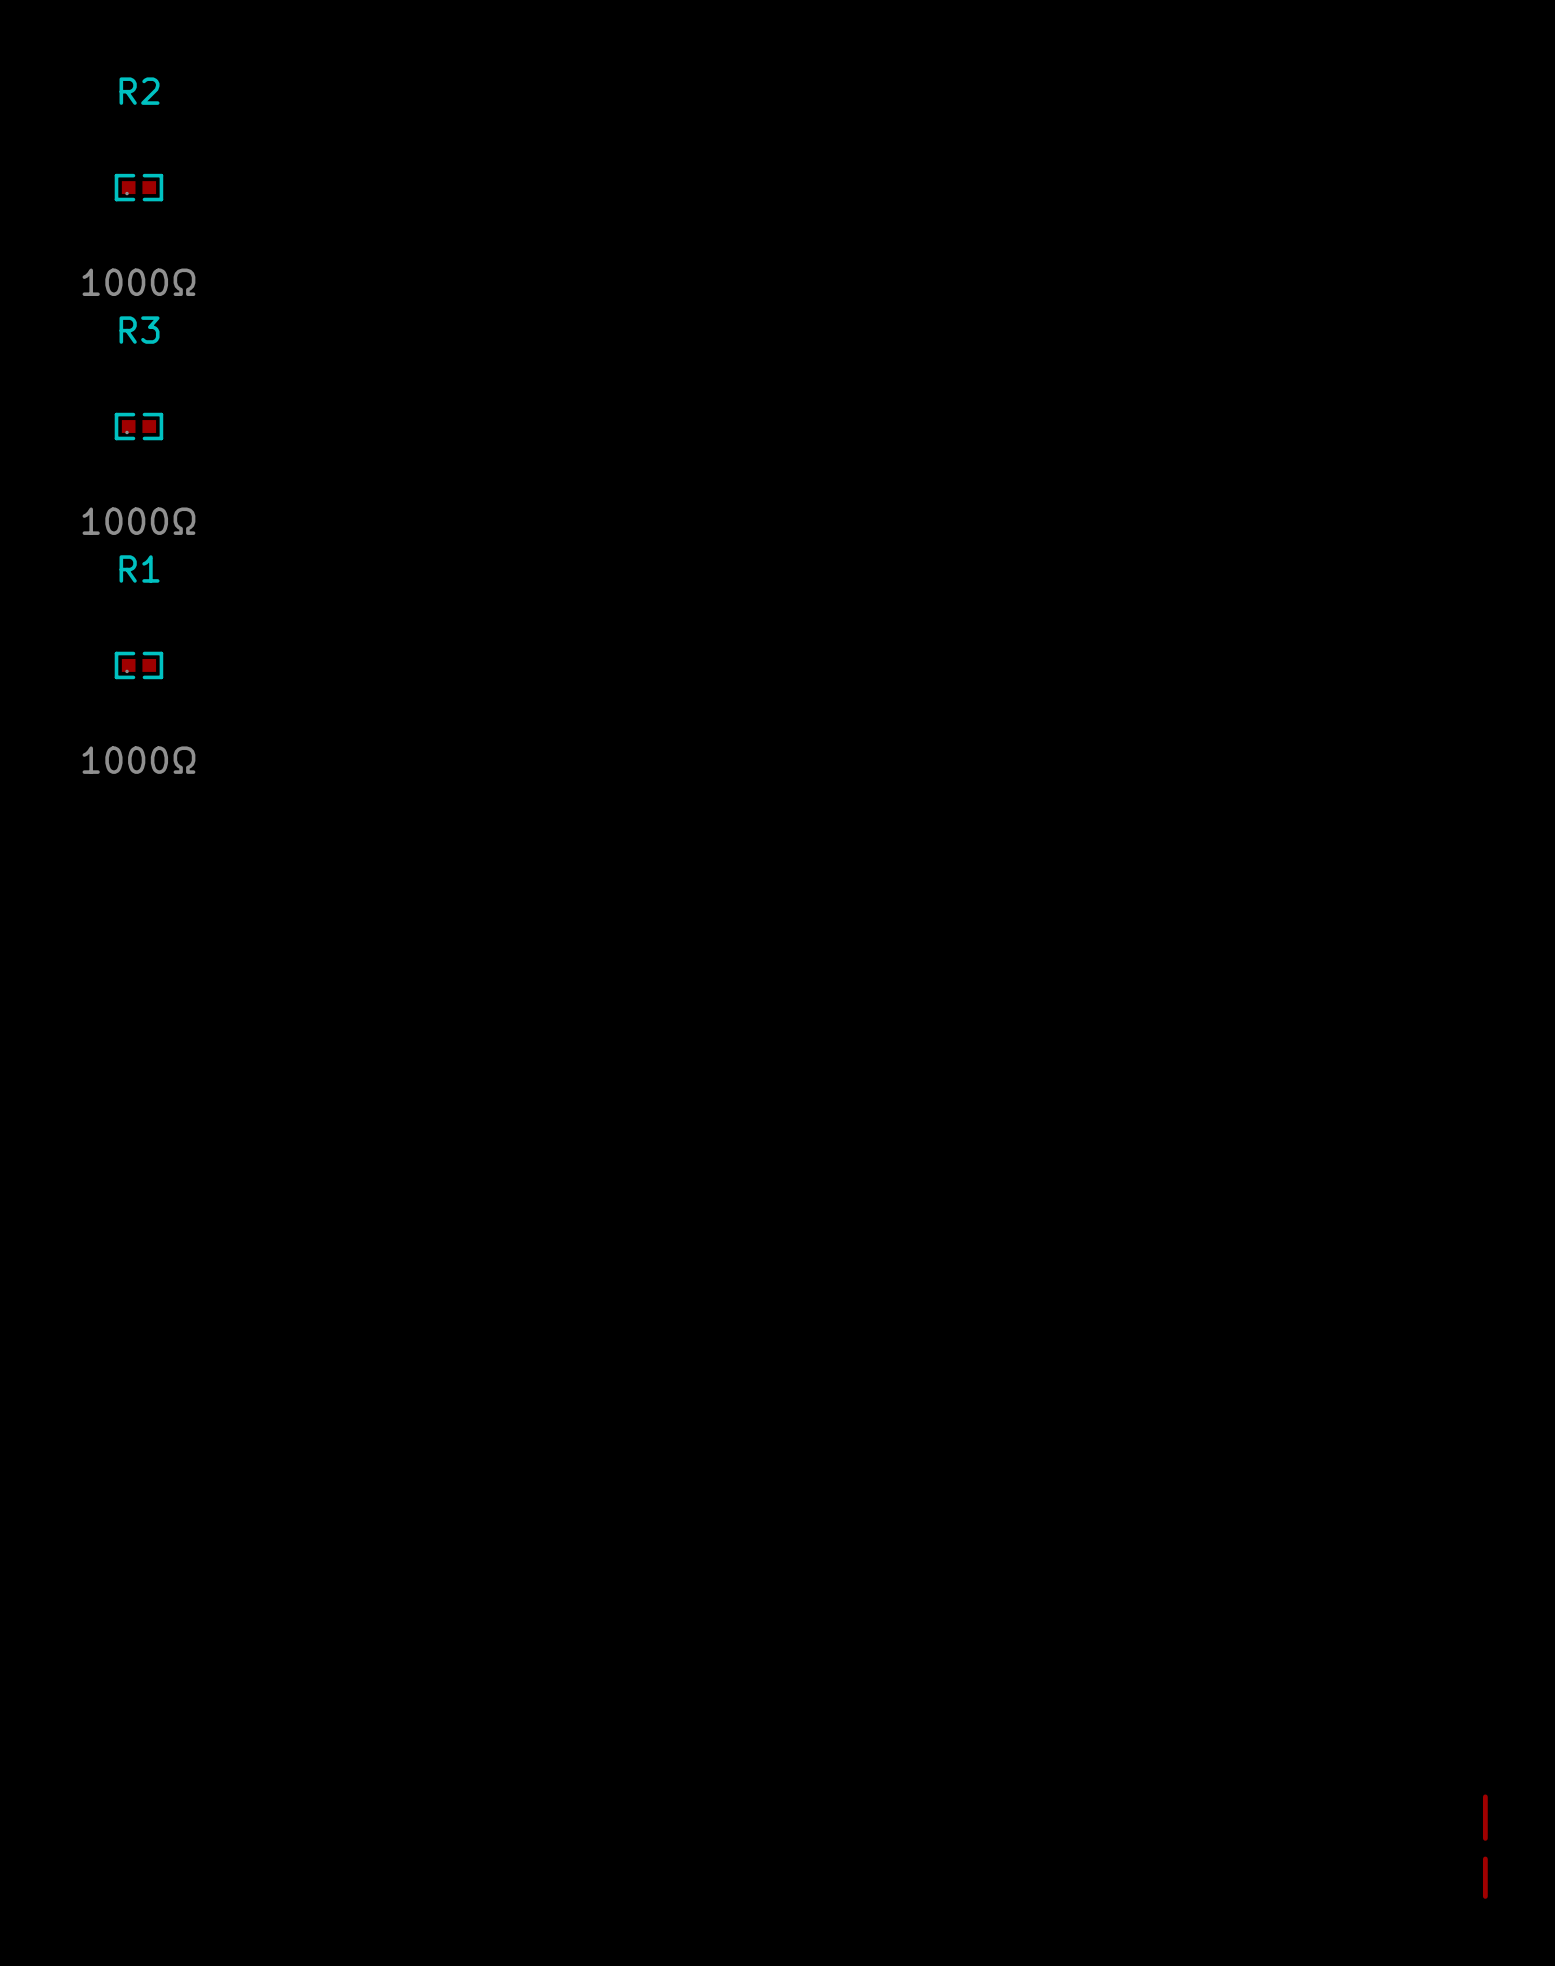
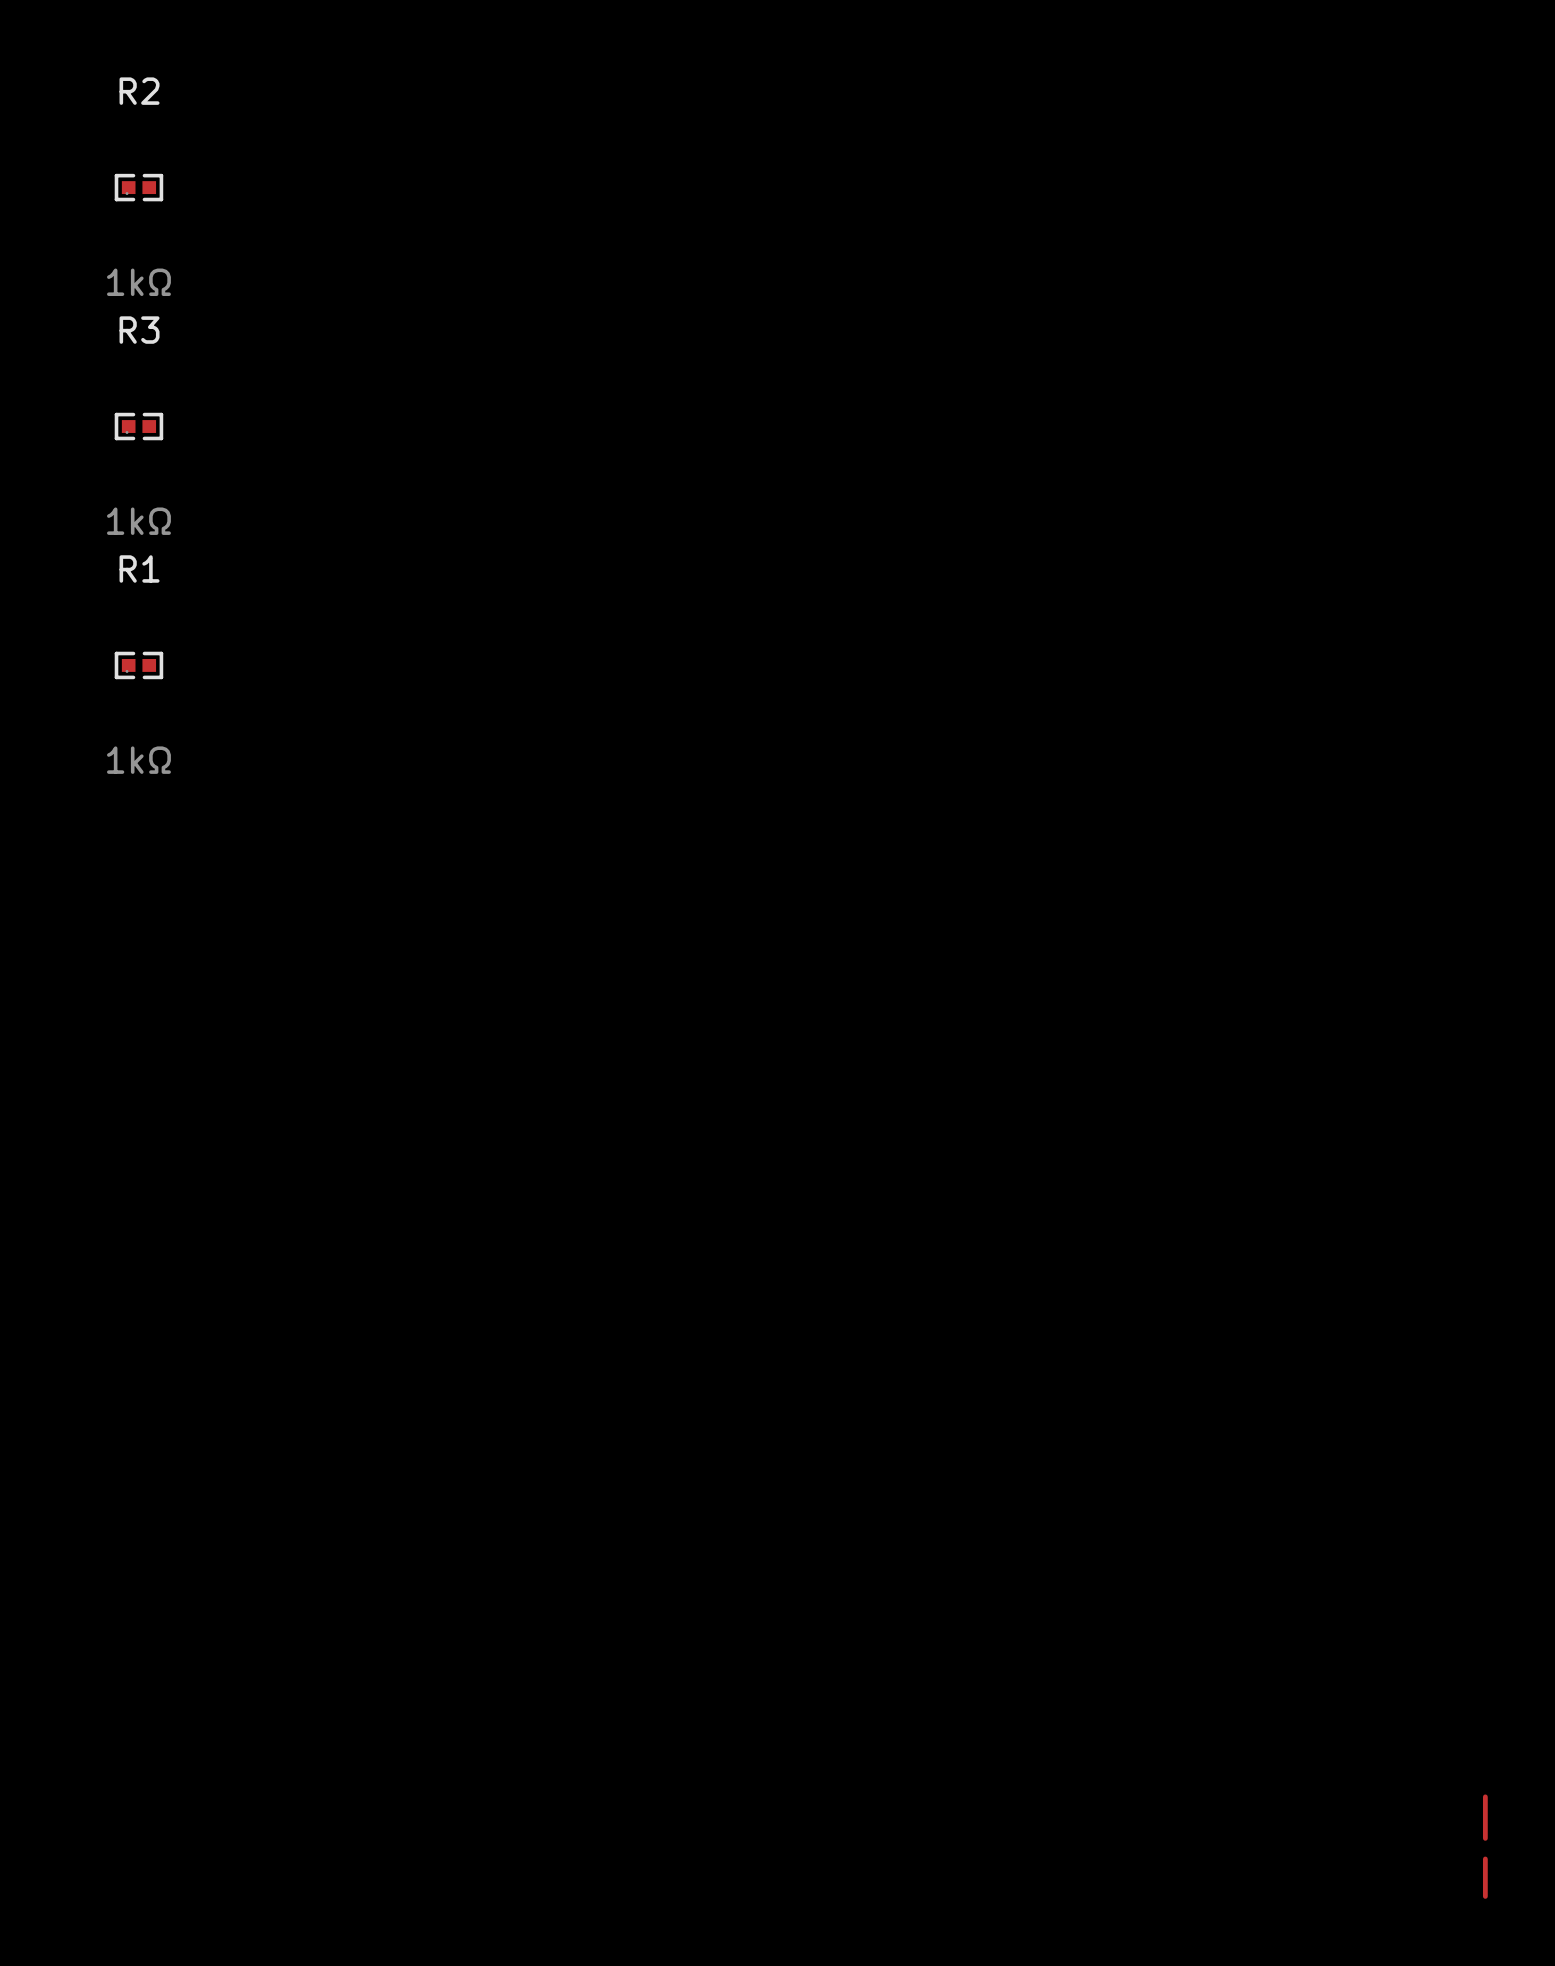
R2 value: 1000Ω (138, 282) -> 1kΩ (138, 282)
R3 value: 1000Ω (138, 521) -> 1kΩ (138, 521)
R1 value: 1000Ω (138, 760) -> 1kΩ (138, 760)

